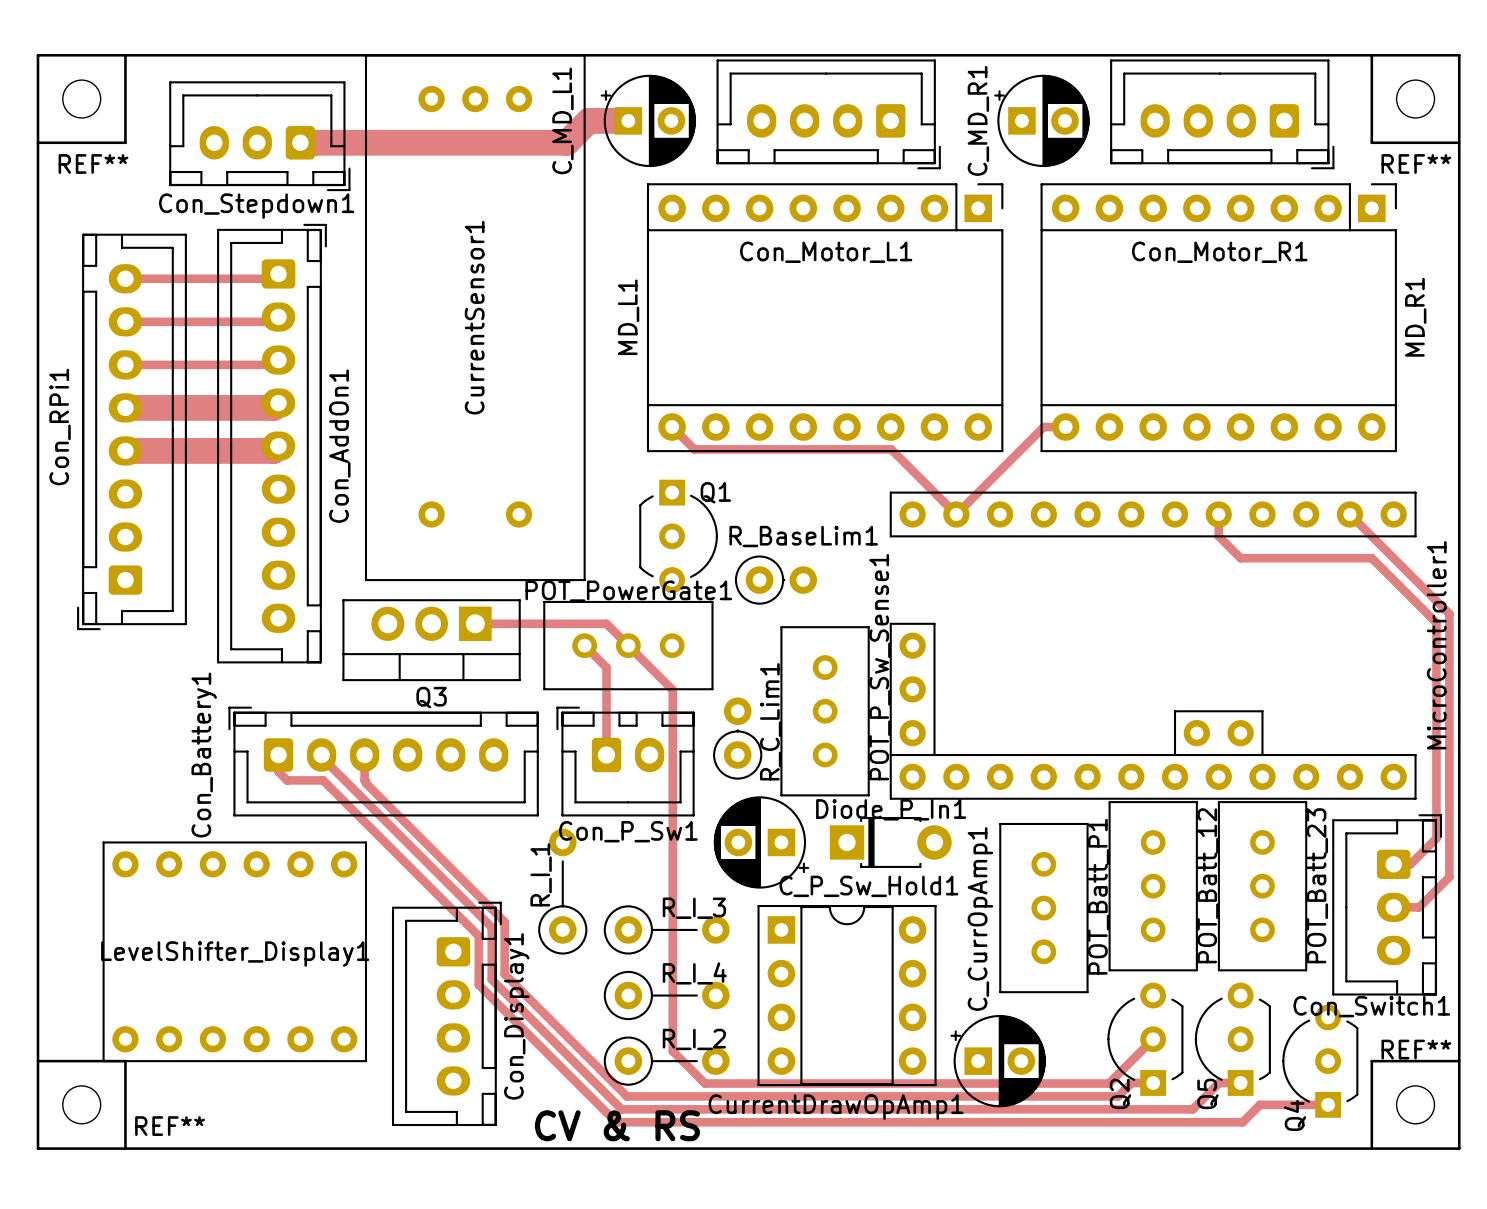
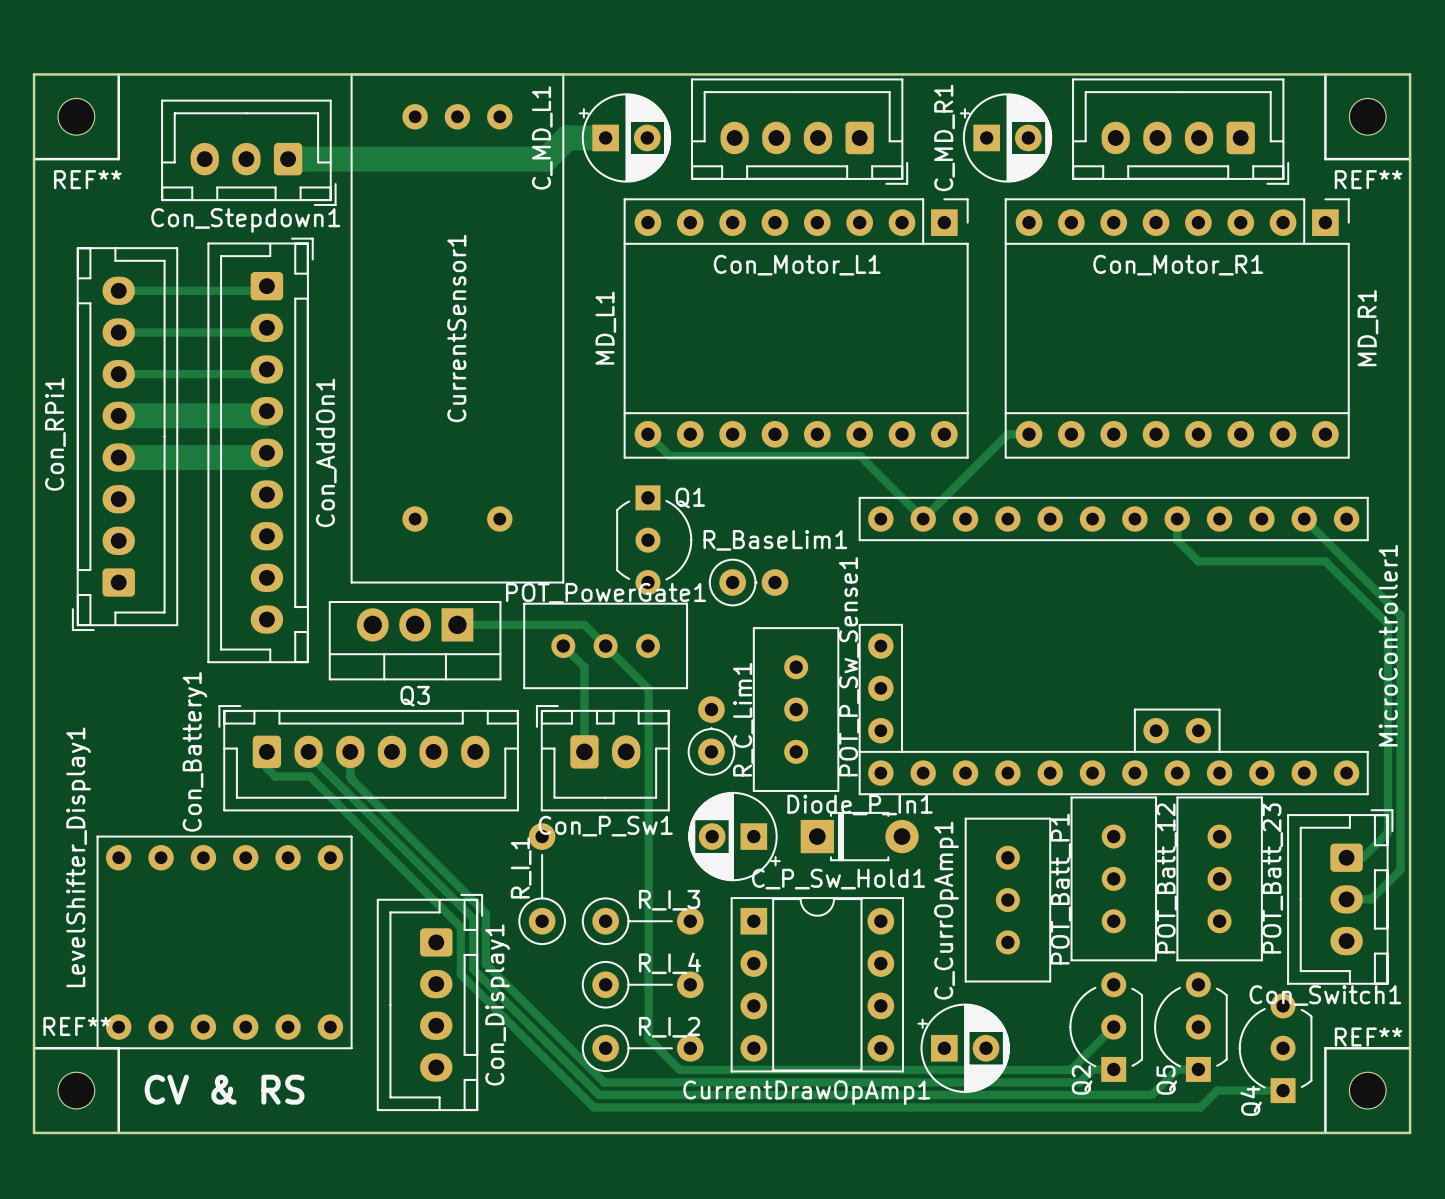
LevelShifter_Display1 name rotation: 0° (235, 954) -> 90° counterclockwise (78, 857)
text position: CV & RS (617, 1125) -> CV & RS (224, 1089)
REF** name position: REF** (170, 1126) -> REF** (77, 1026)

